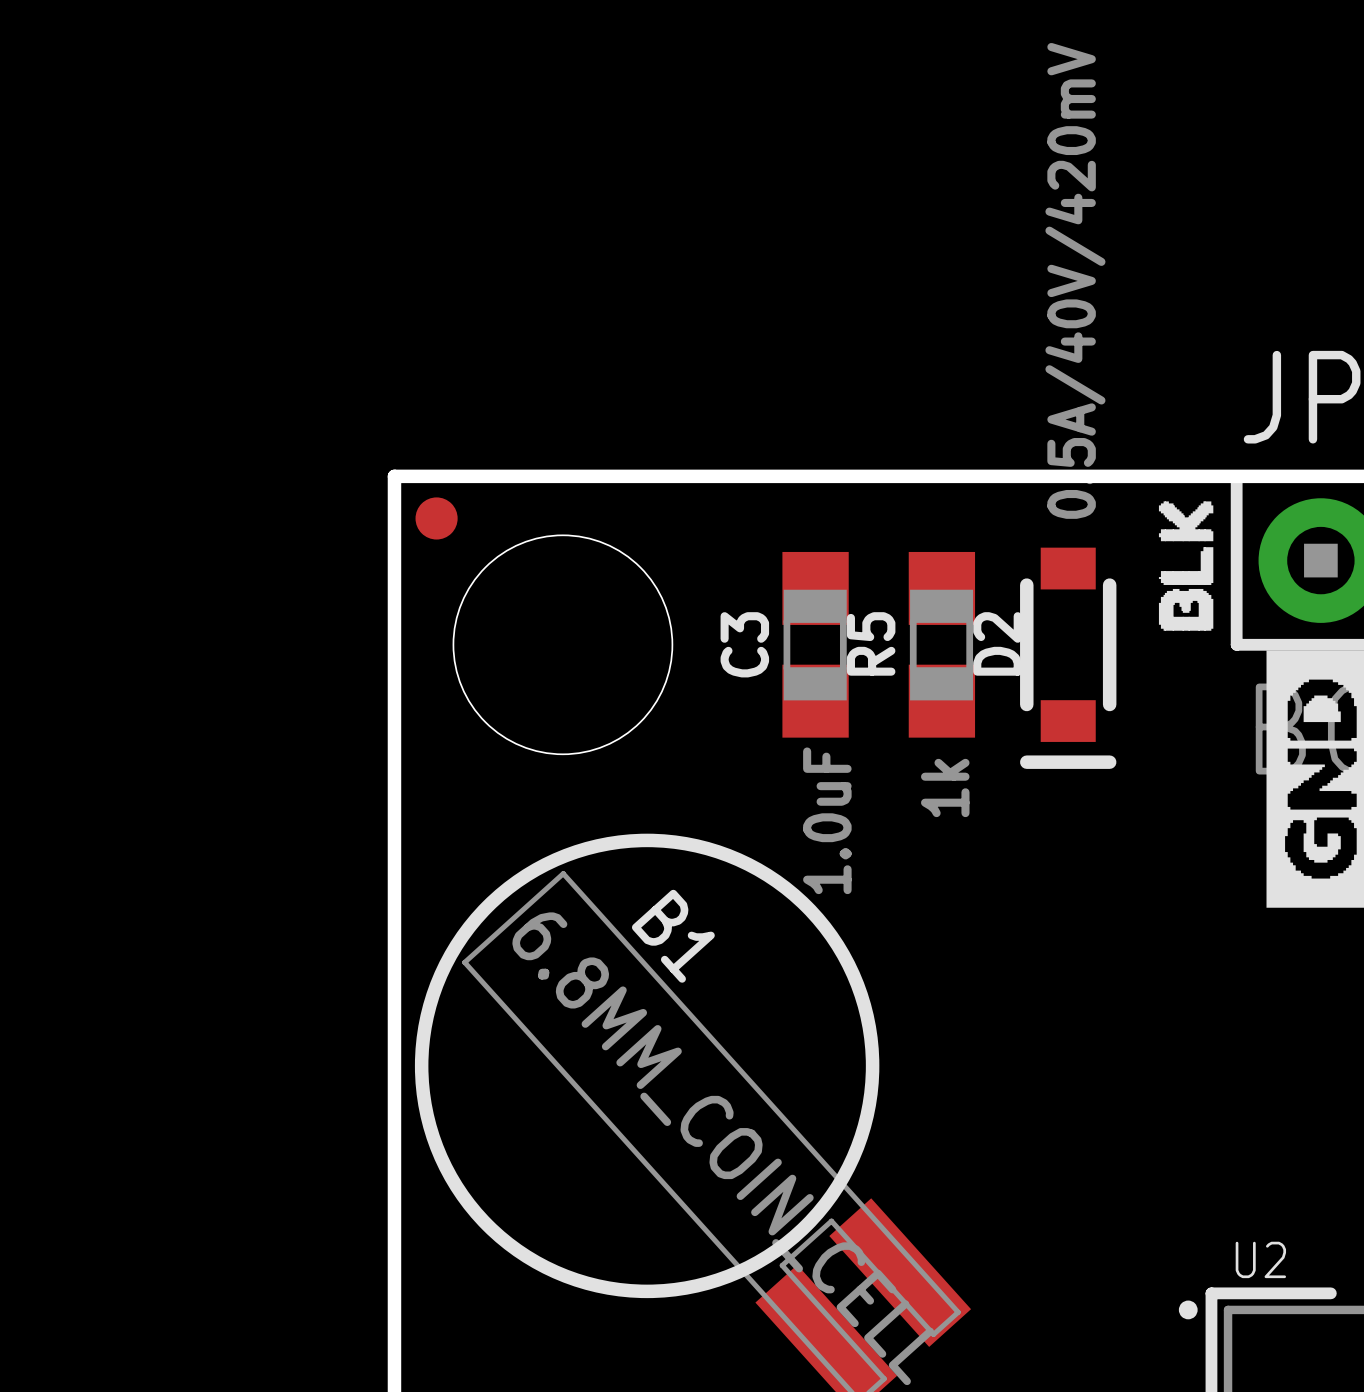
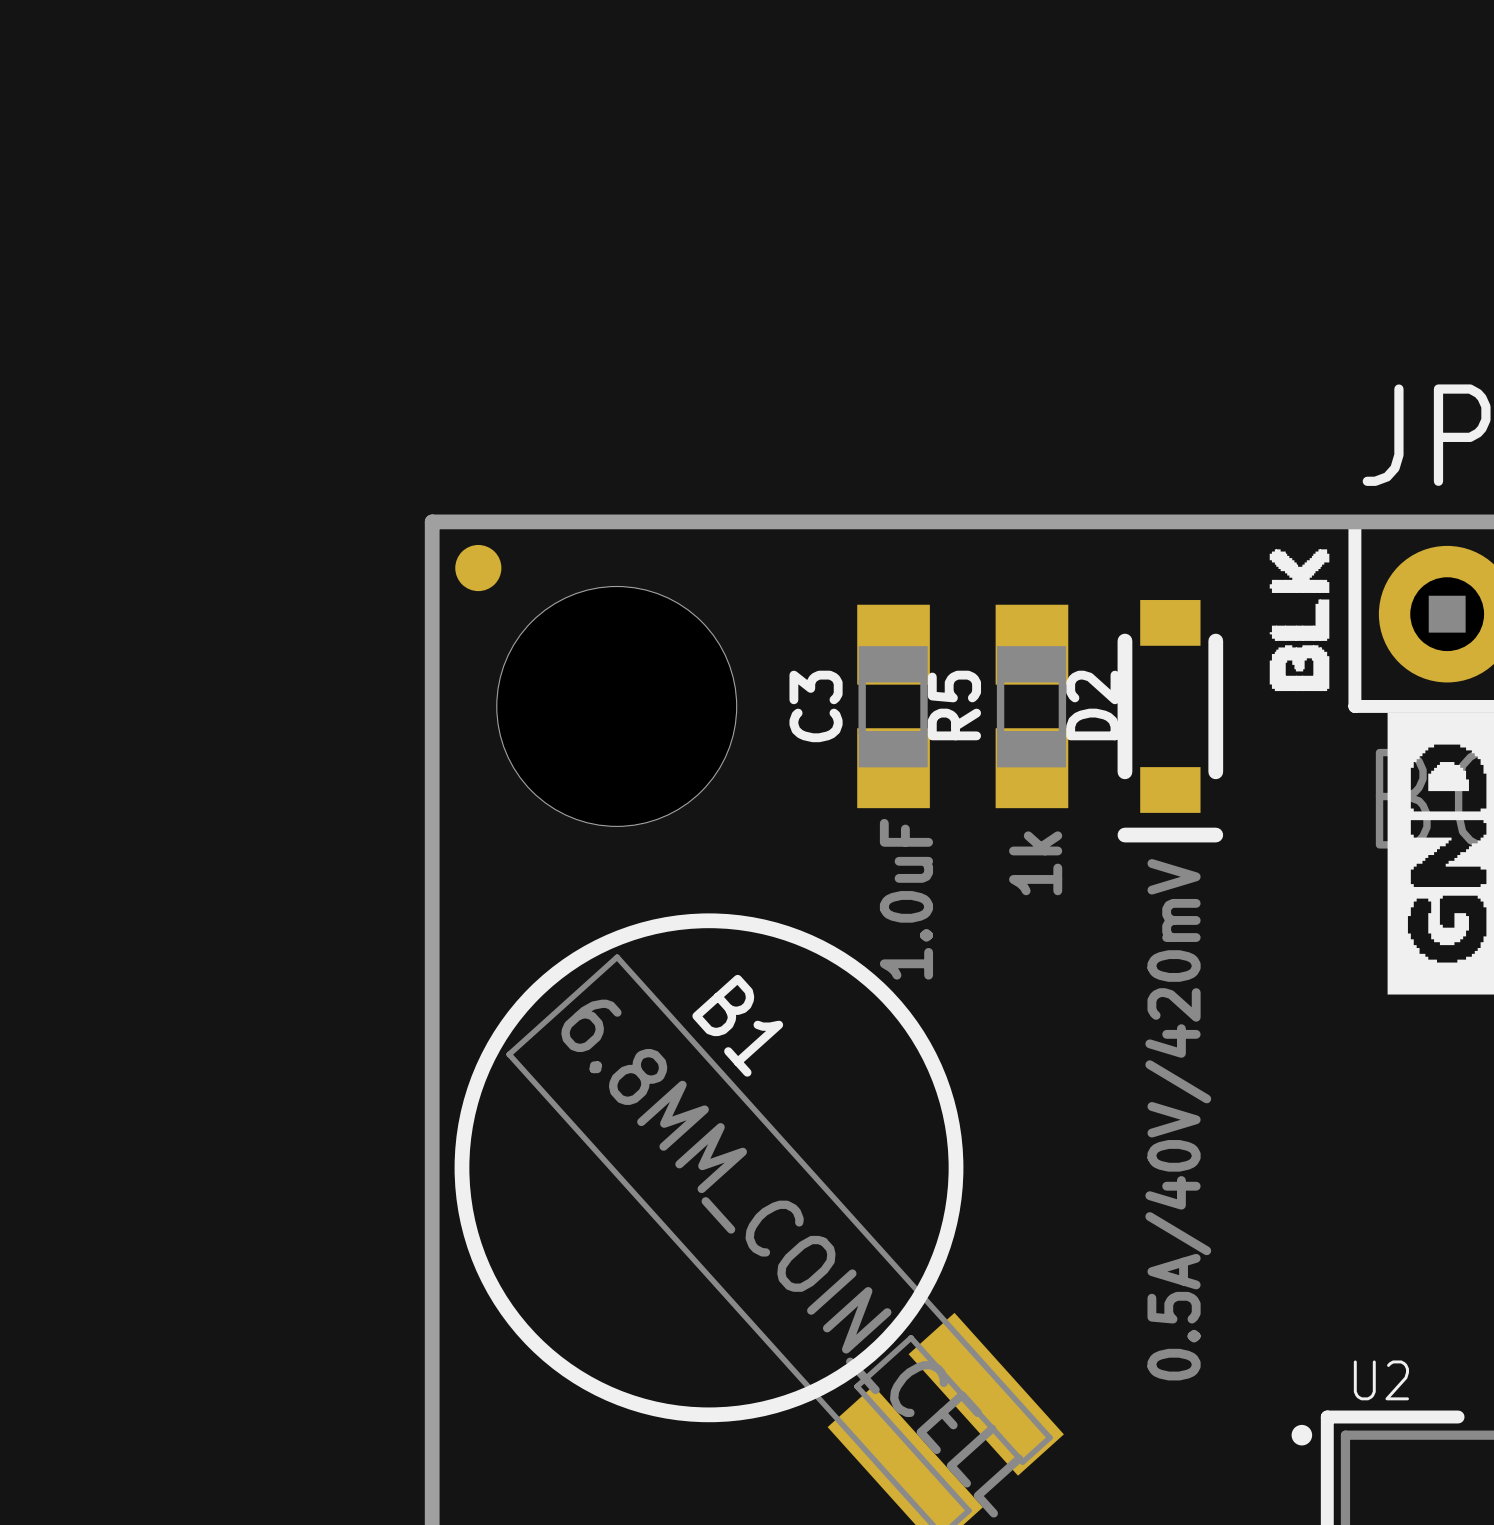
D2 value position: 0.5A/40V/420mV (1075, 280) -> 0.5A/40V/420mV (1178, 1119)

